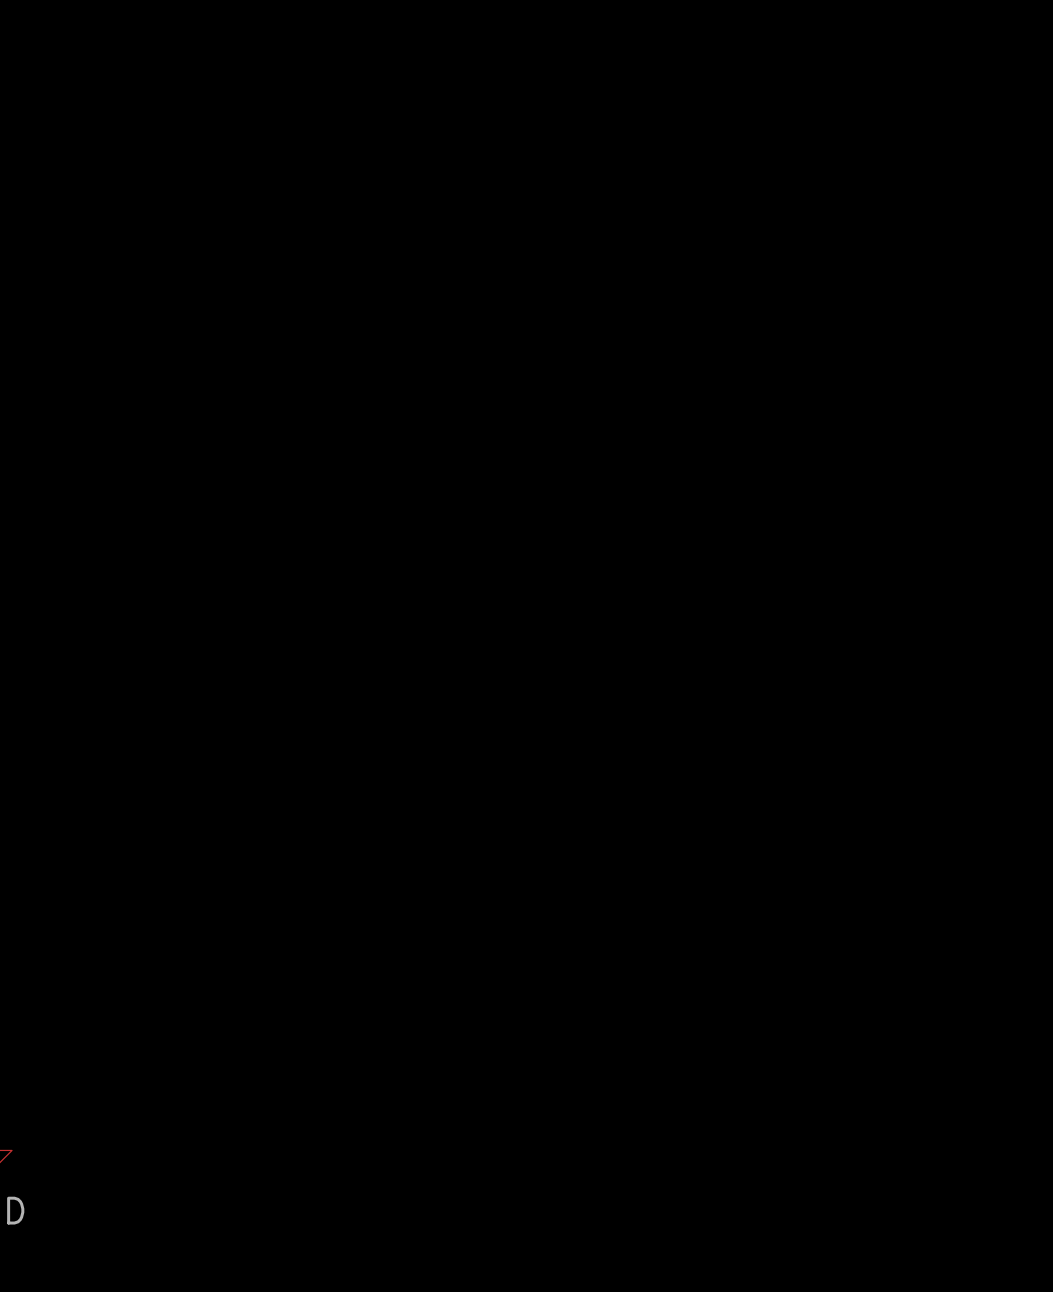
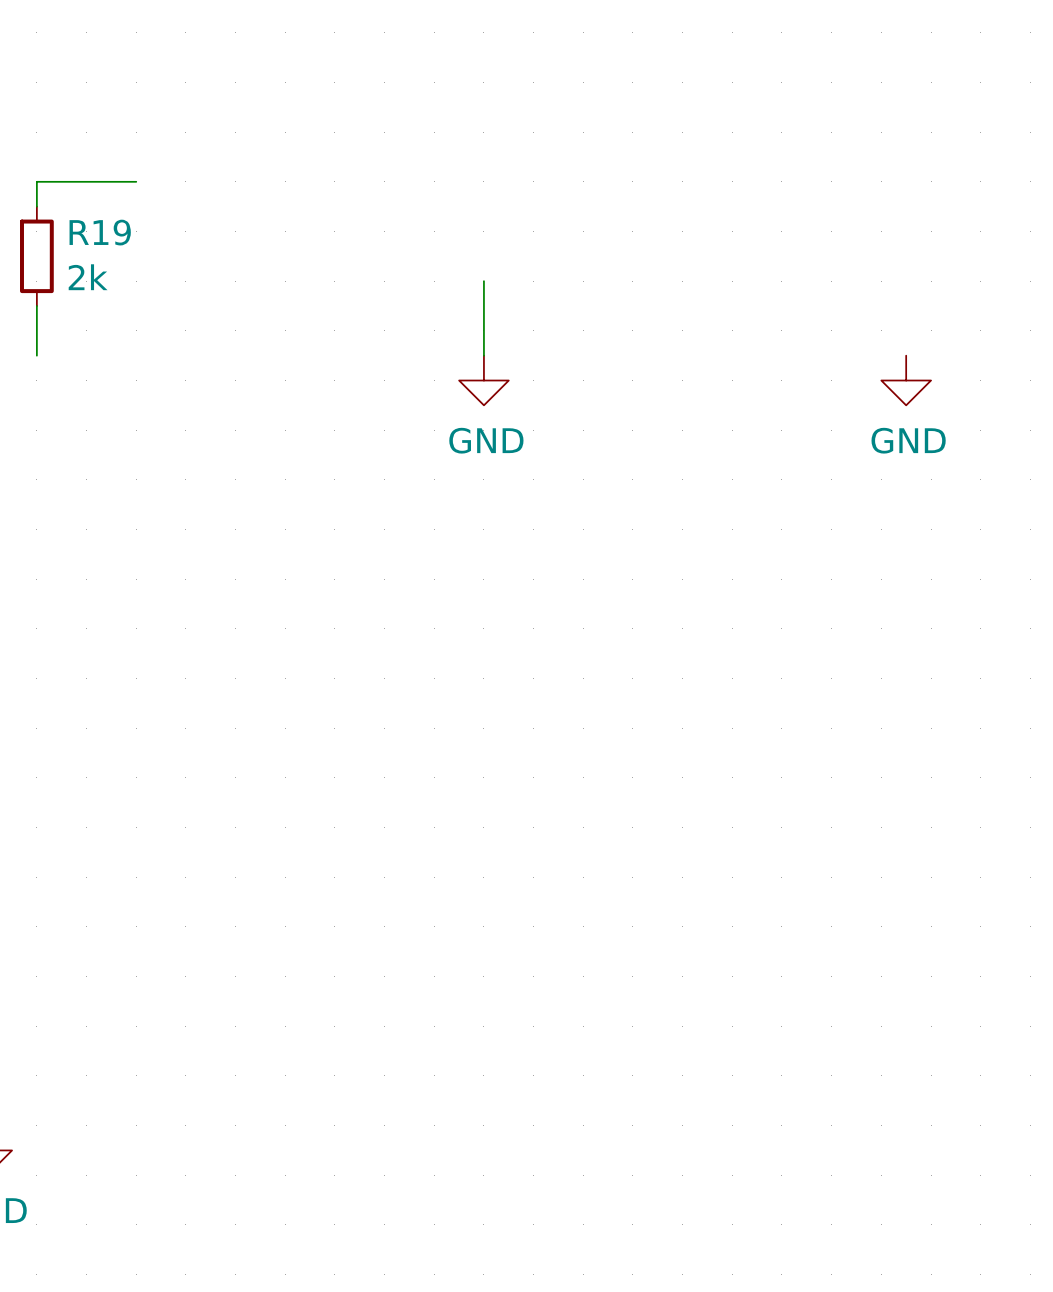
wire: none -> (136, 181) (36, 181) (36, 206)
R19: none -> 2k (36, 256)
wire: none -> (483, 281) (483, 355)
wire: none -> (36, 306) (36, 355)
power symbol: none -> GND (483, 380)
power symbol: none -> GND (906, 380)

